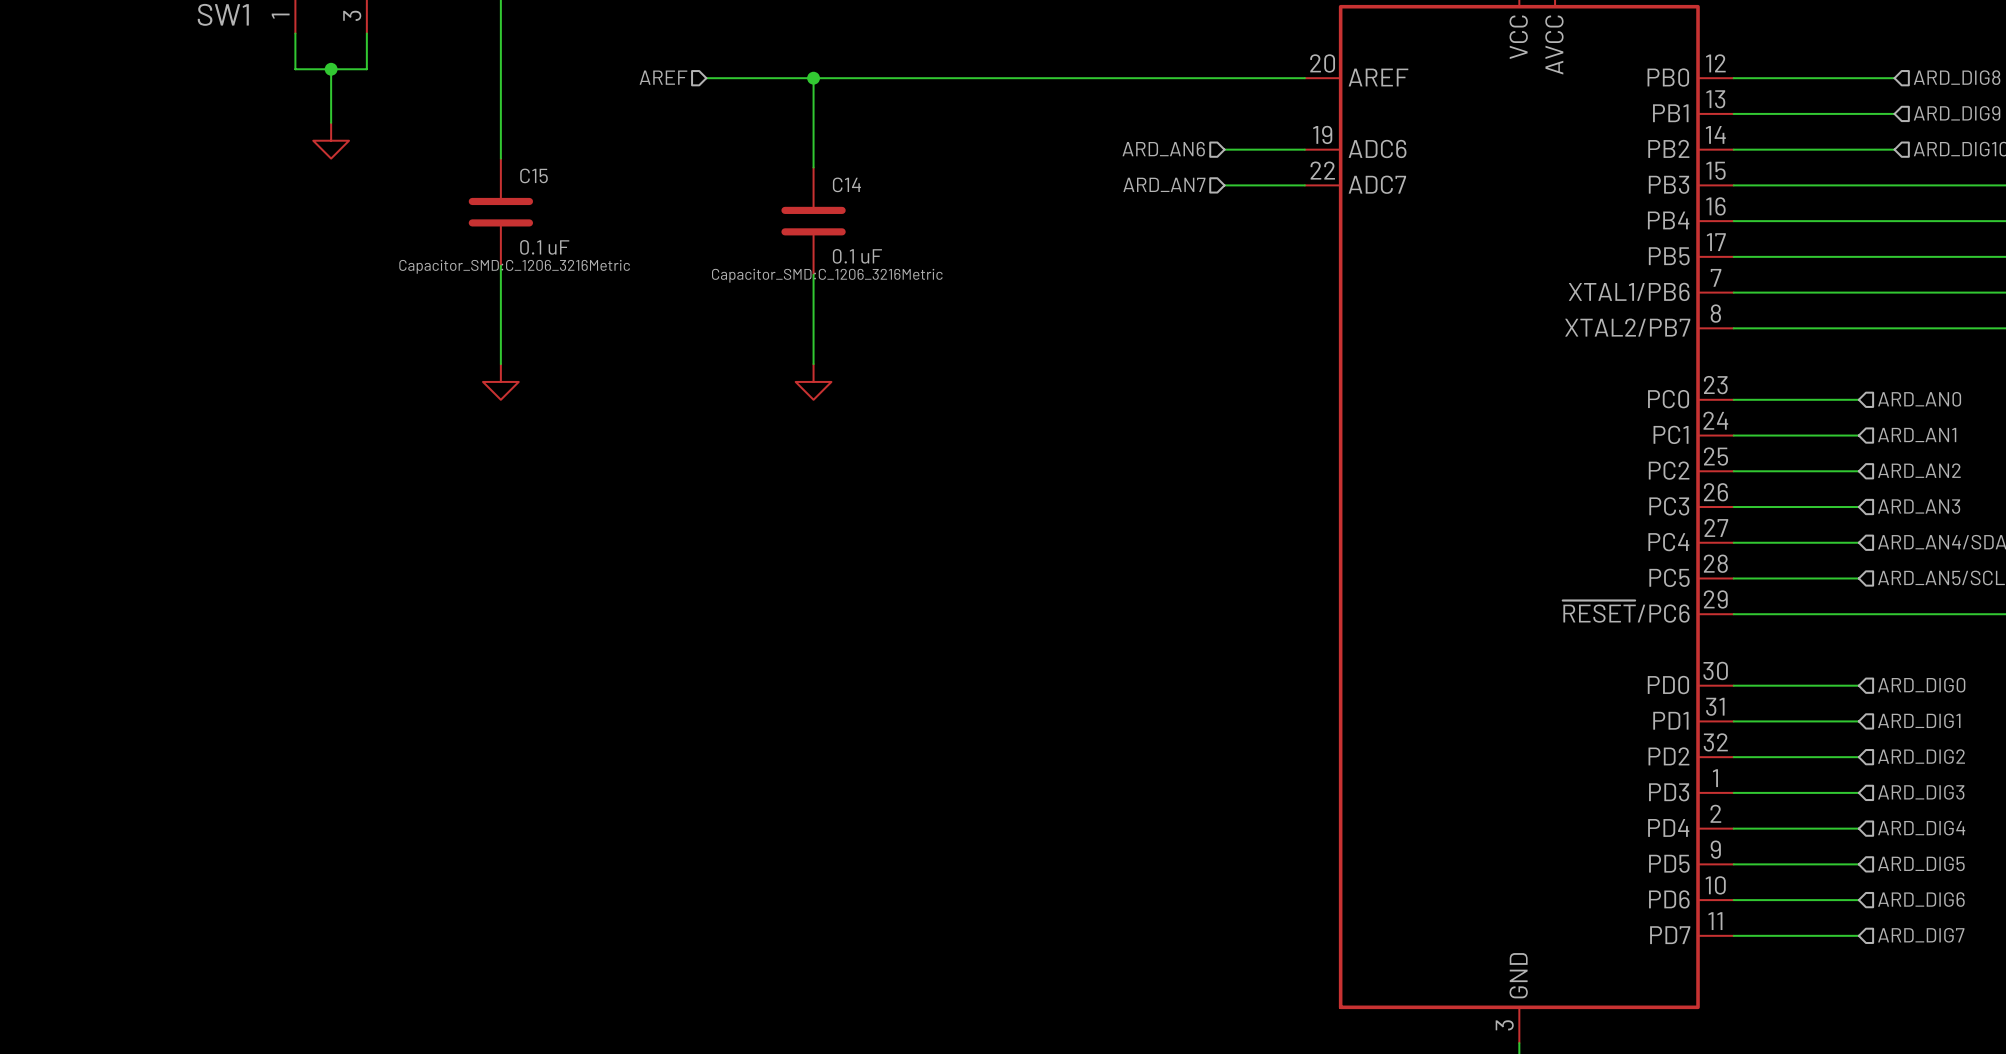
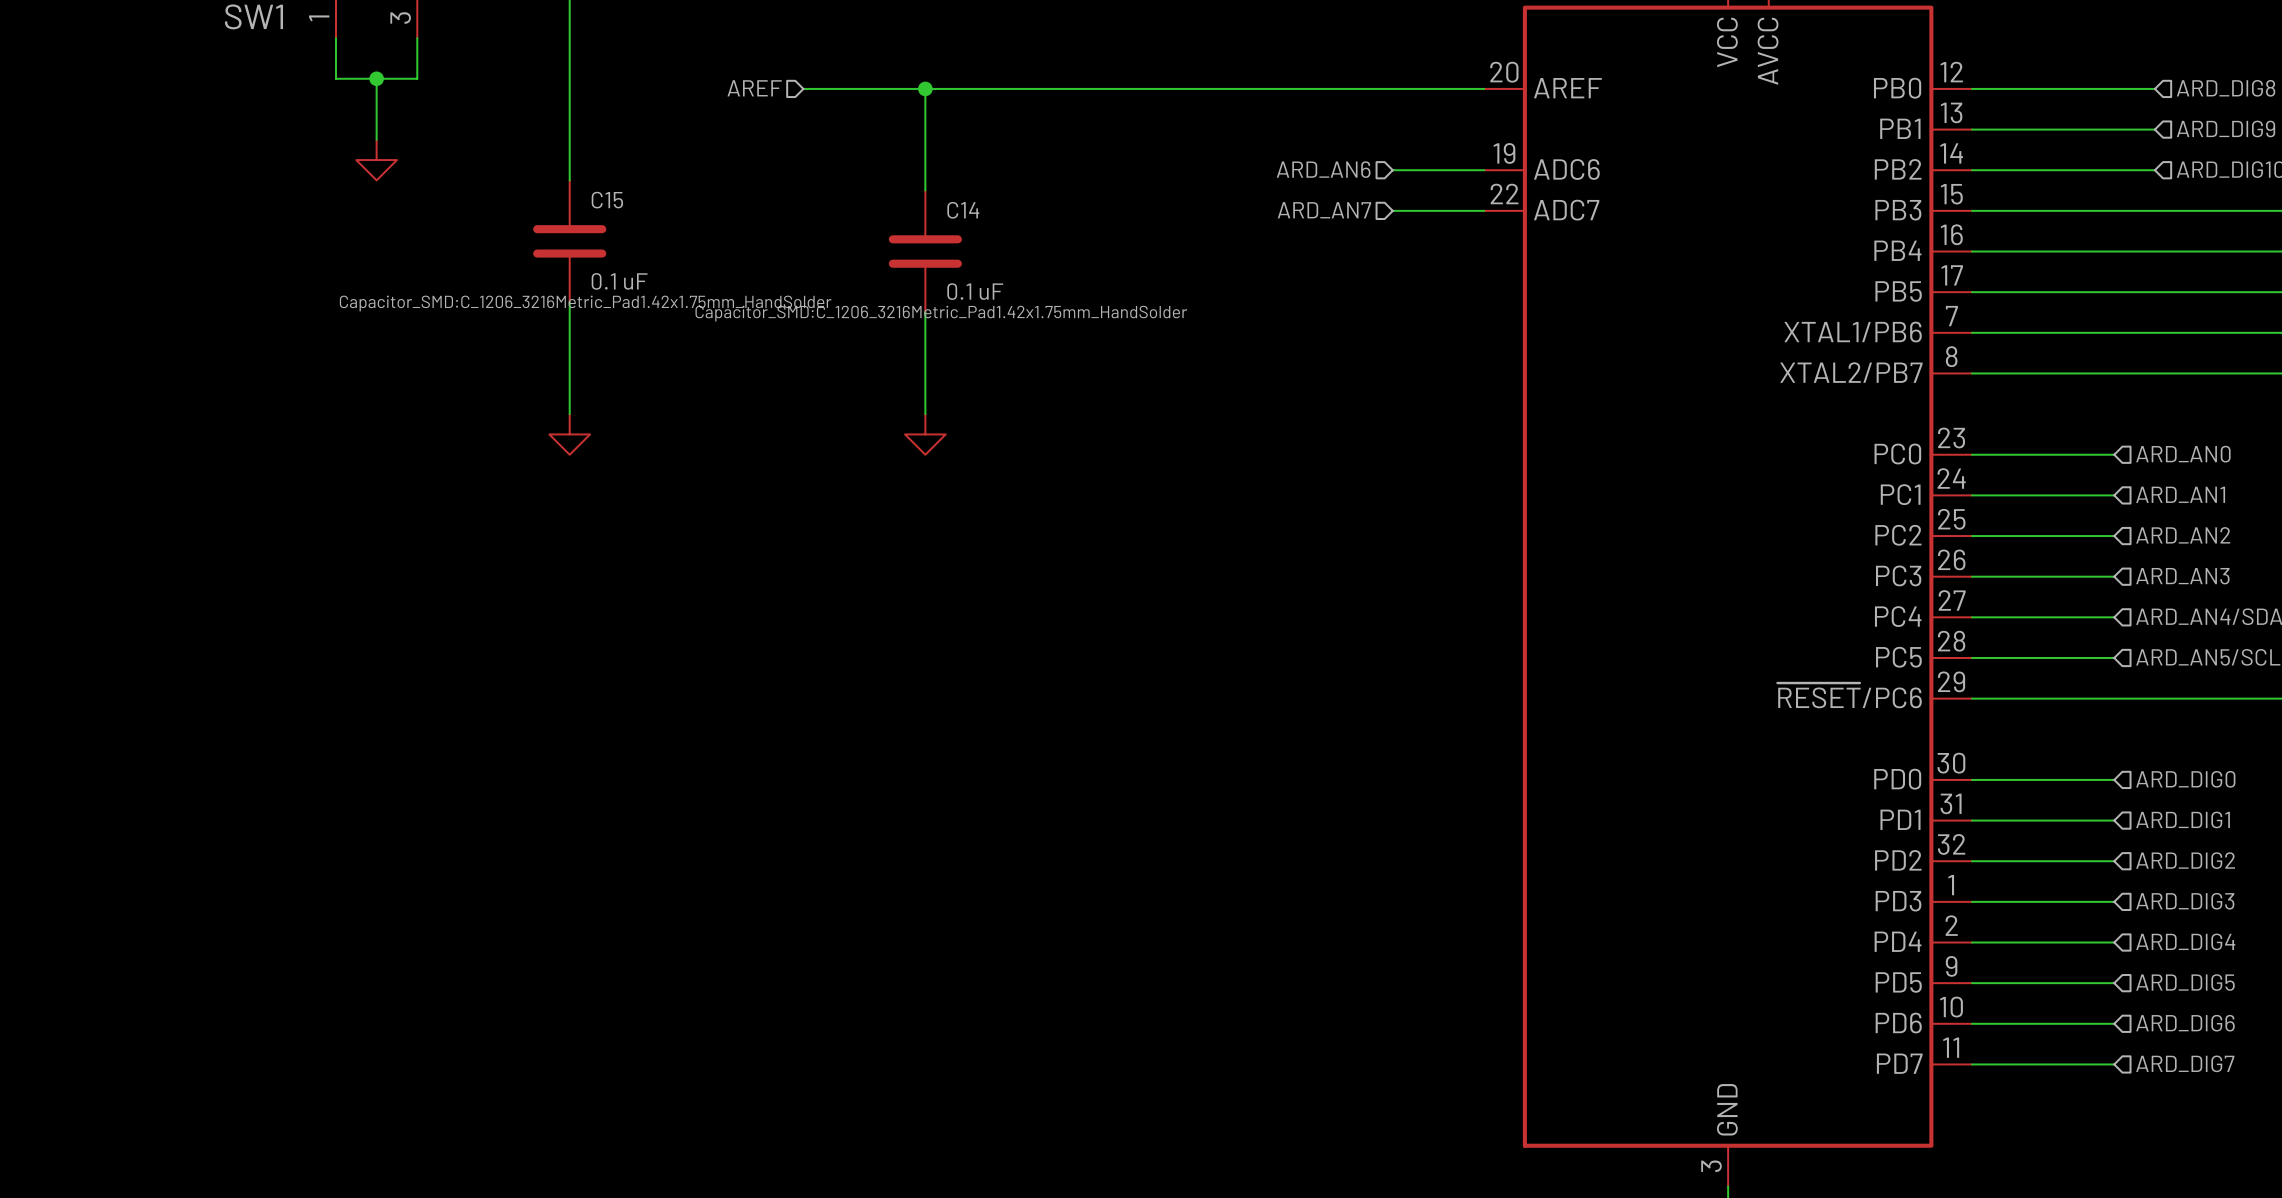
C15 text: Capacitor_SMD:C_1206_3216Metric (514, 266) -> Capacitor_SMD:C_1206_3216Metric_Pad1.42x1.75mm_HandSolder (585, 303)
C14 text: Capacitor_SMD:C_1206_3216Metric (827, 275) -> Capacitor_SMD:C_1206_3216Metric_Pad1.42x1.75mm_HandSolder (941, 313)

